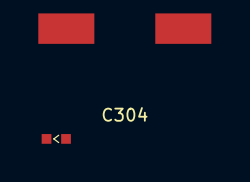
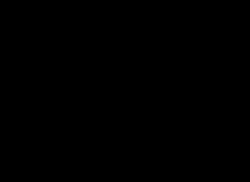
C304: (124, 28) -> none
part: (56, 138) -> none

